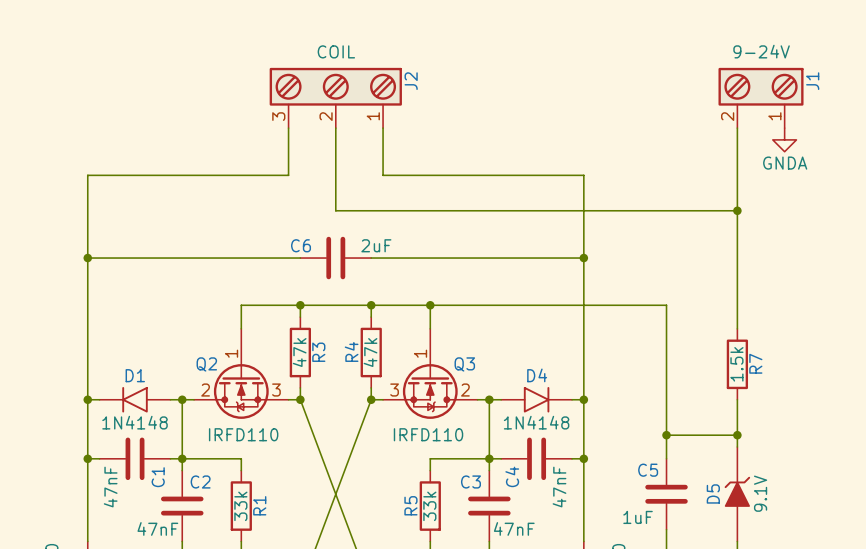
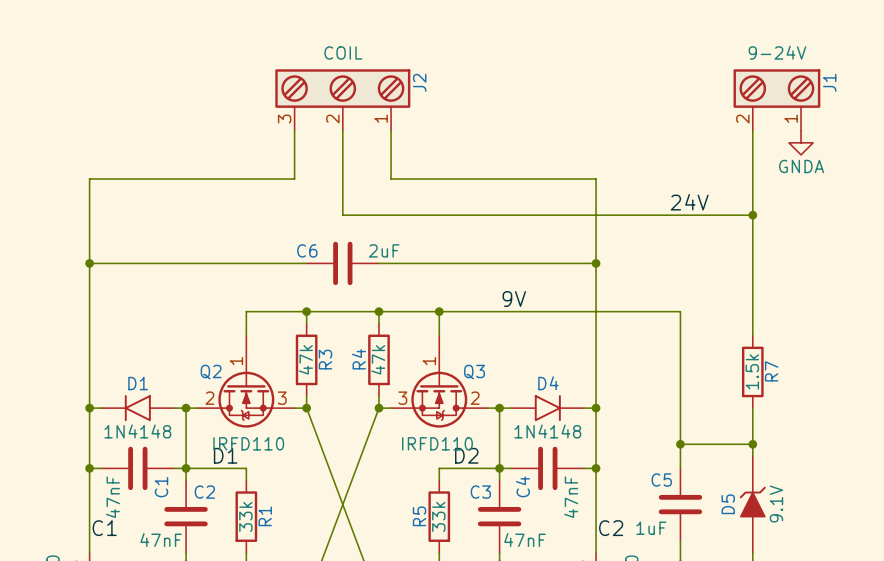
label: none -> 24V (689, 202)
label: none -> 9V (514, 299)
label: none -> D1 (225, 455)
label: none -> D2 (466, 455)
label: none -> C1 (104, 528)
label: none -> C2 (611, 528)

